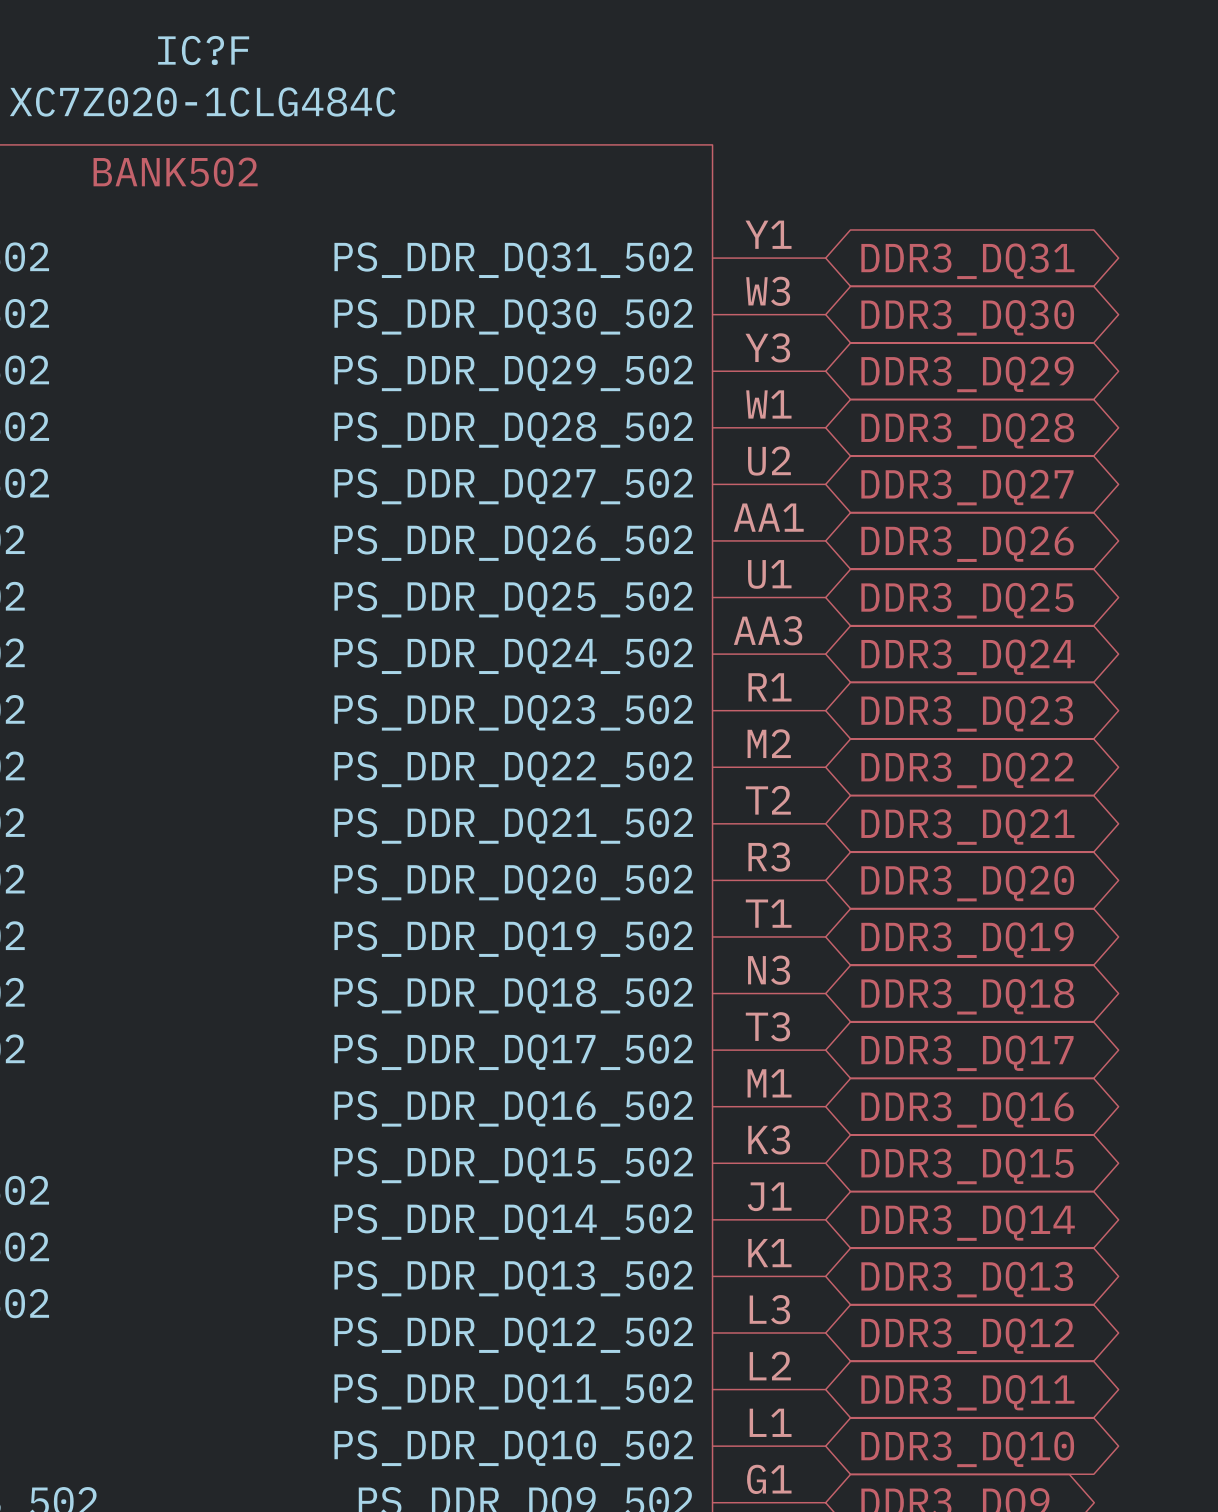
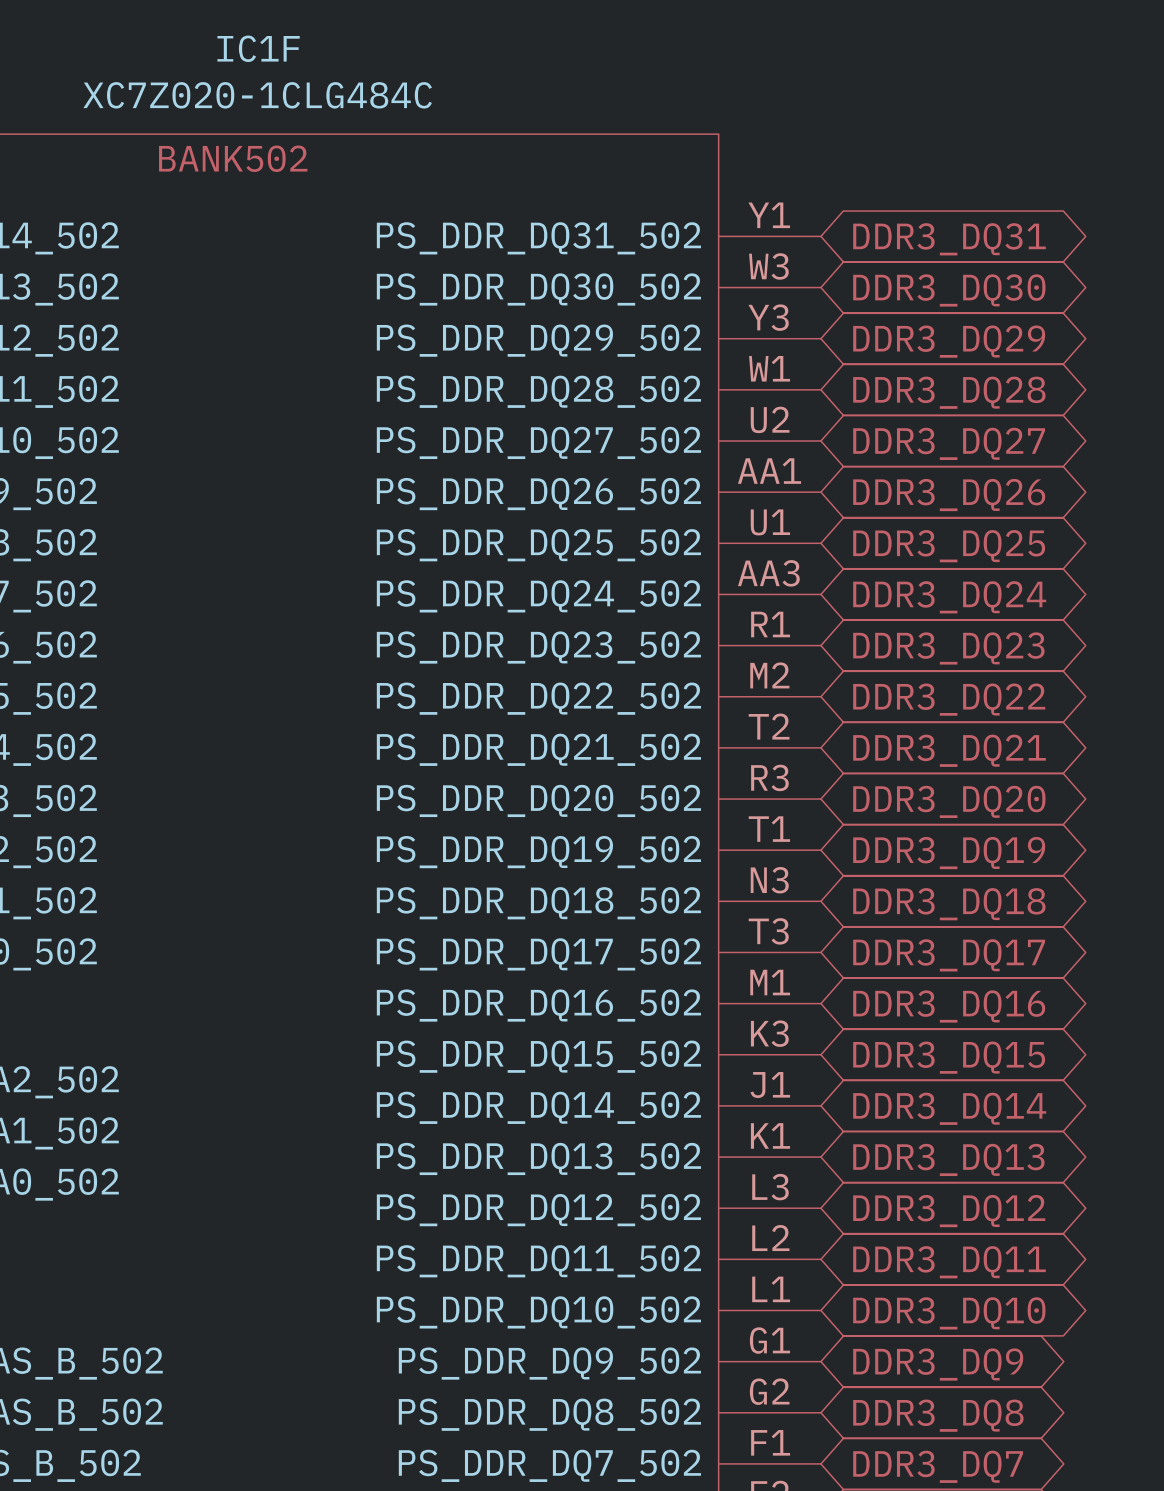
IC?F name: IC?F (203, 50) -> IC1F (258, 48)

